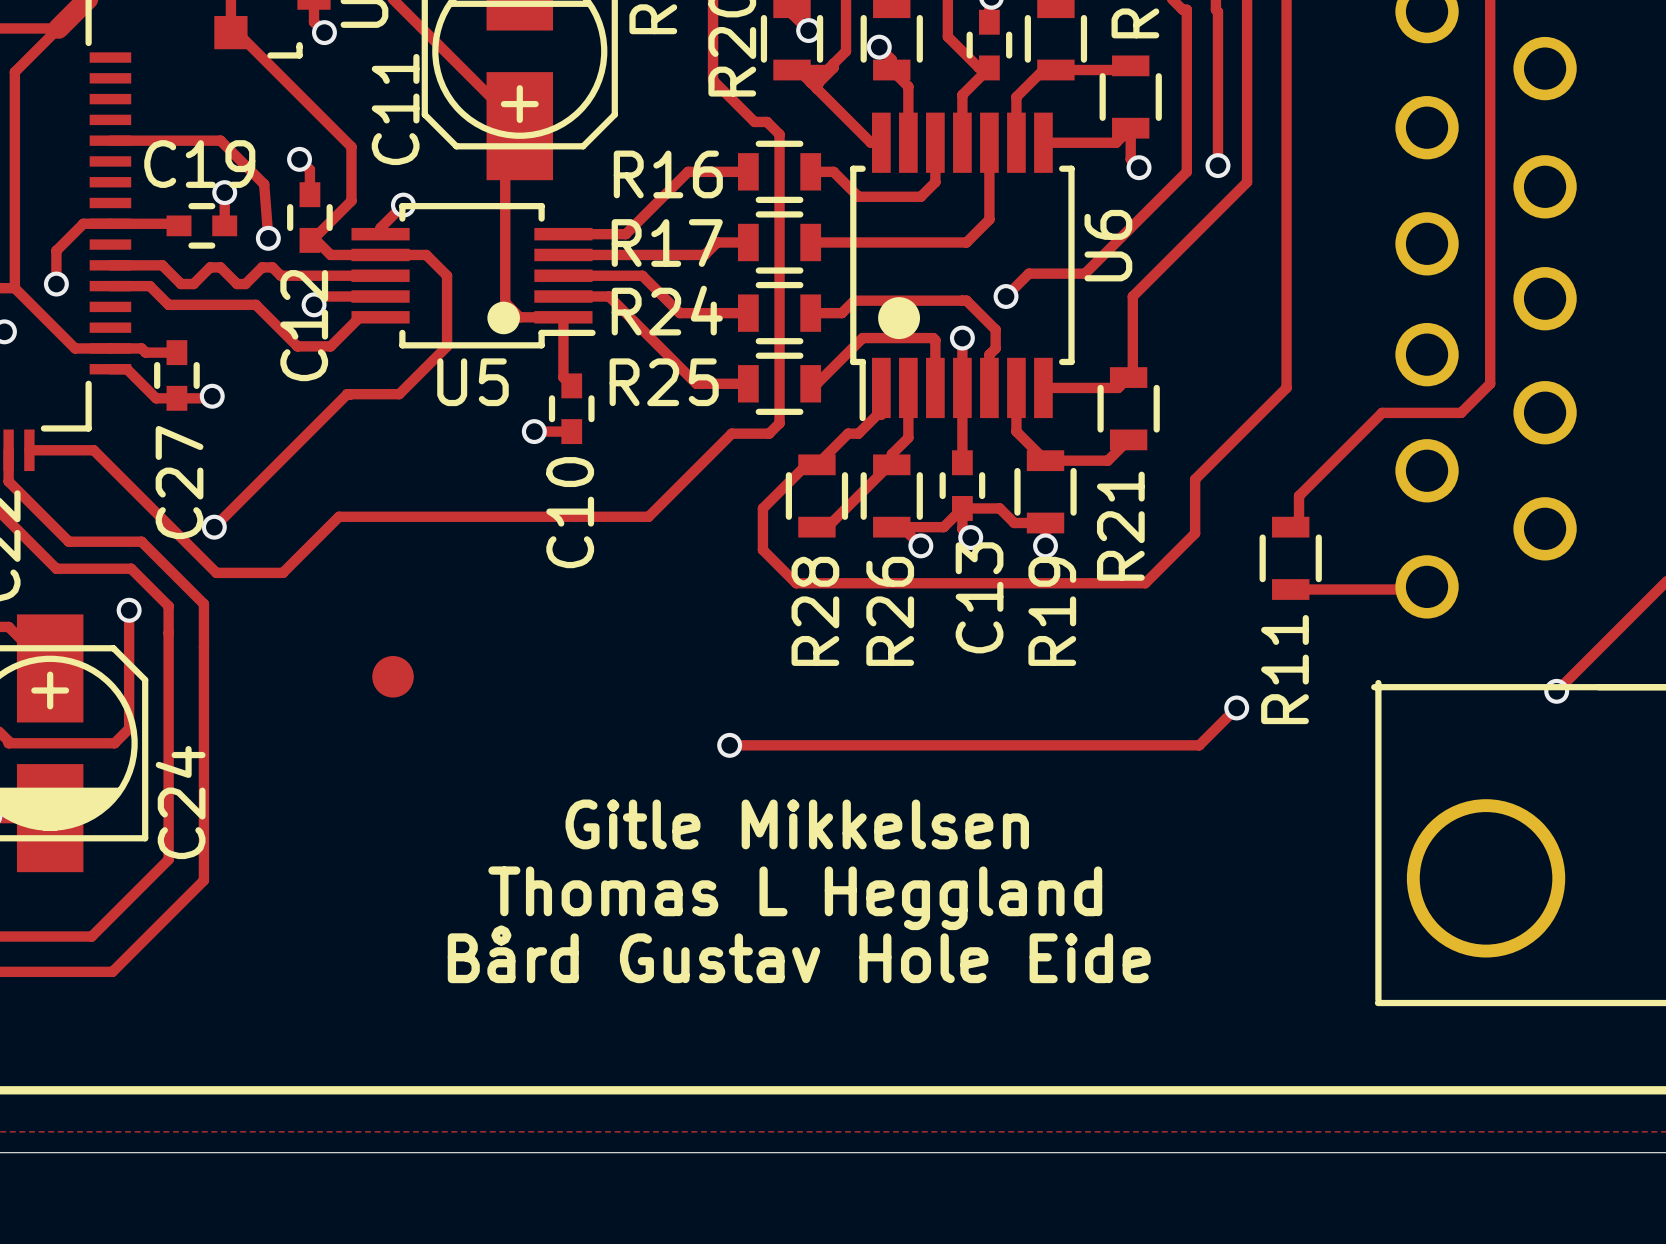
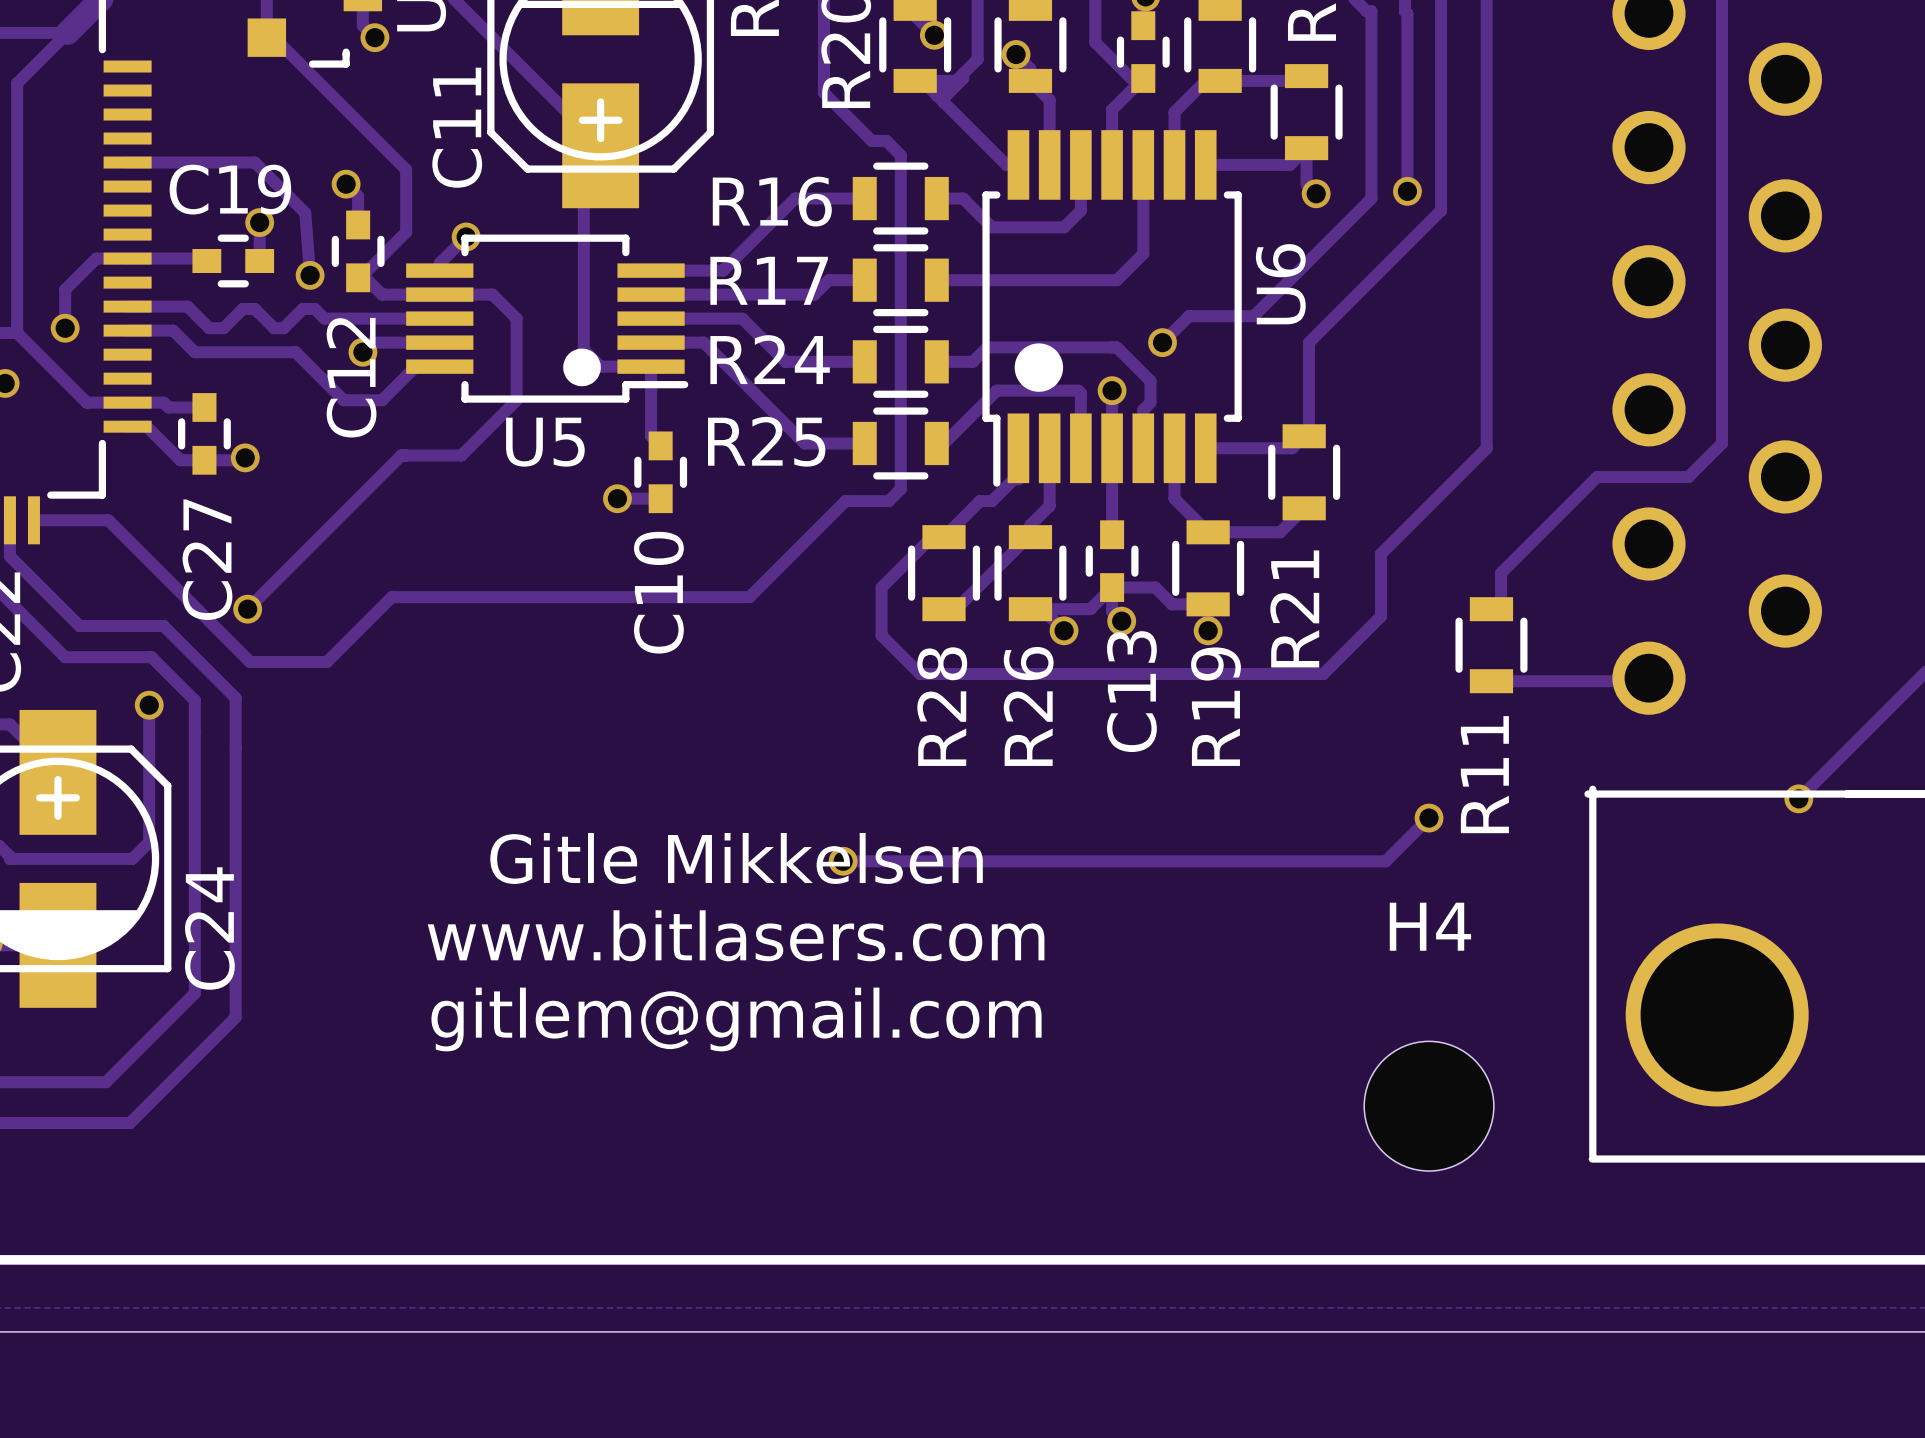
part: (393, 676) -> none
text: none -> www.bitlasers.com (736, 935)
text position: Gitle Mikkelsen (797, 824) -> Gitle Mikkelsen (736, 858)
text: none -> gitlem@gmail.com (736, 1019)
text: Thomas L Heggland (795, 898) -> none
text: Bård Gustav Hole Eide (799, 954) -> none
H4: none -> (1429, 1106)

